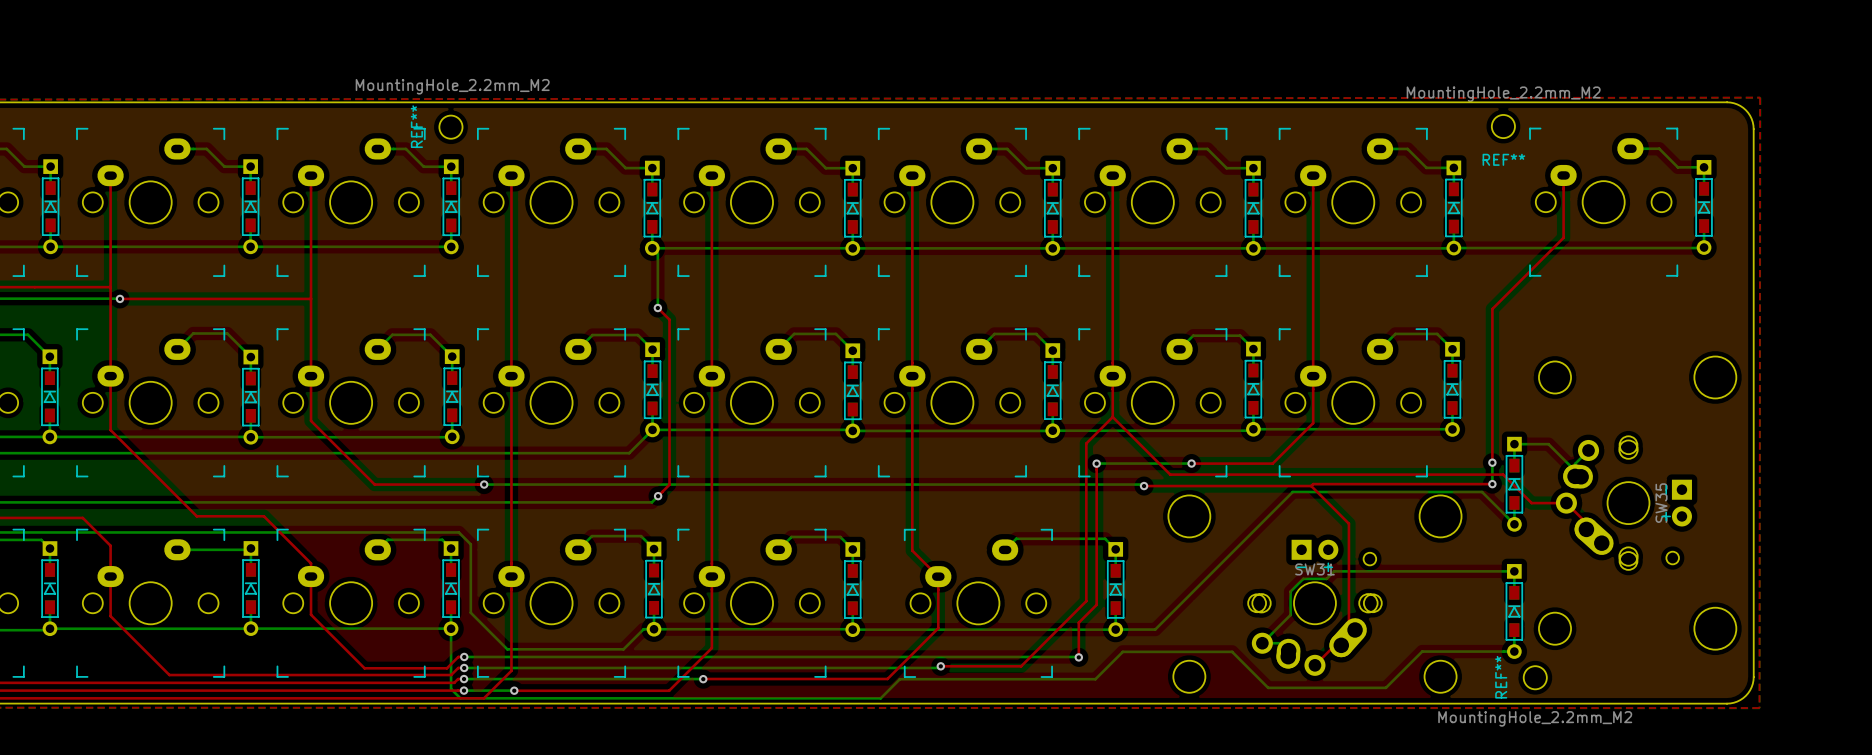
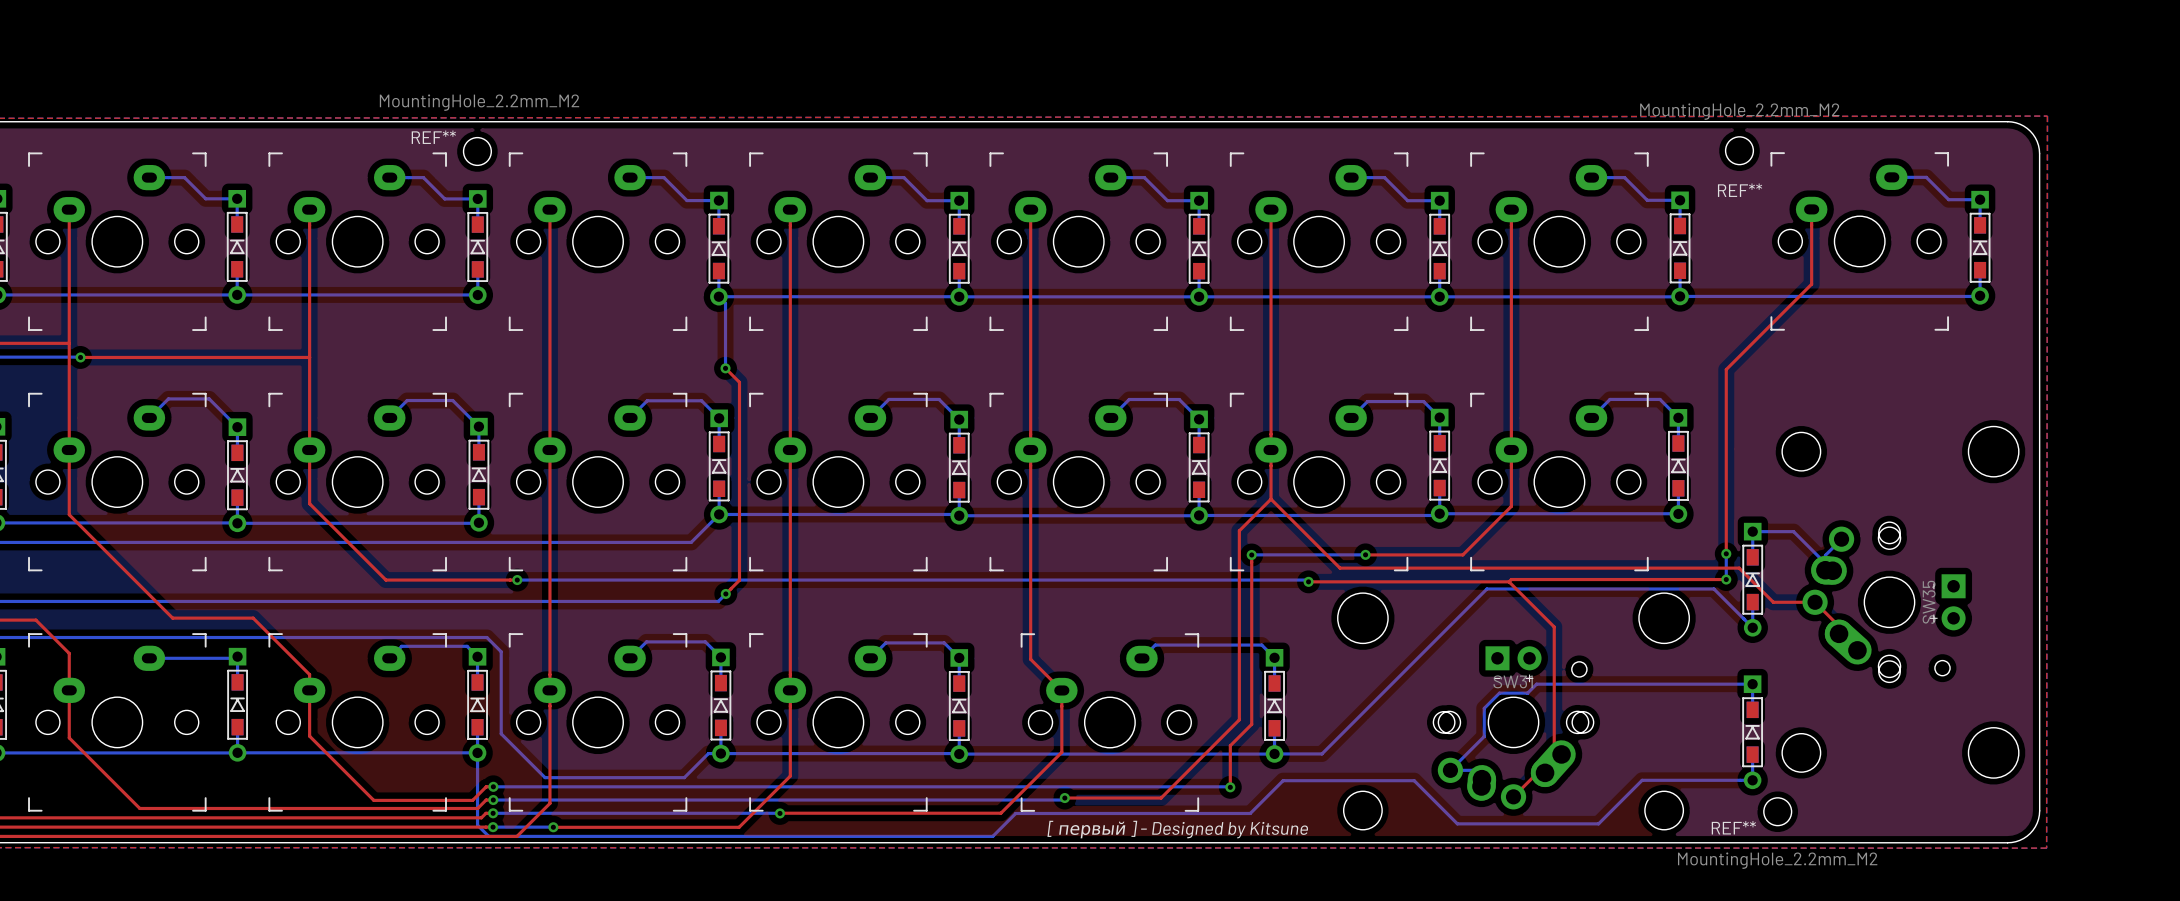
REF** name rotation: 0° (416, 126) -> 90° clockwise (433, 137)
REF** name rotation: 0° (1501, 677) -> 90° clockwise (1733, 827)
text: none -> [ первый ] - Designed by Kitsune (1177, 829)

